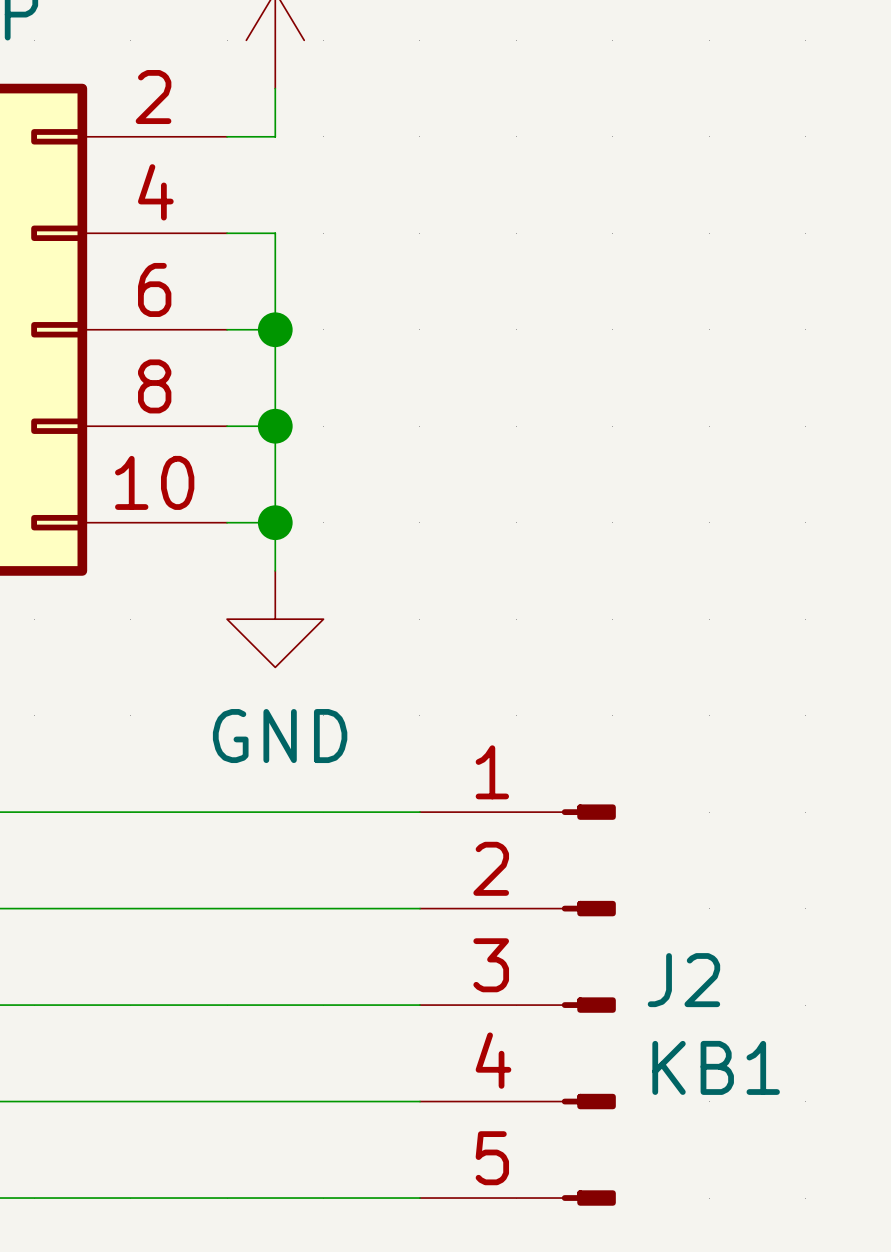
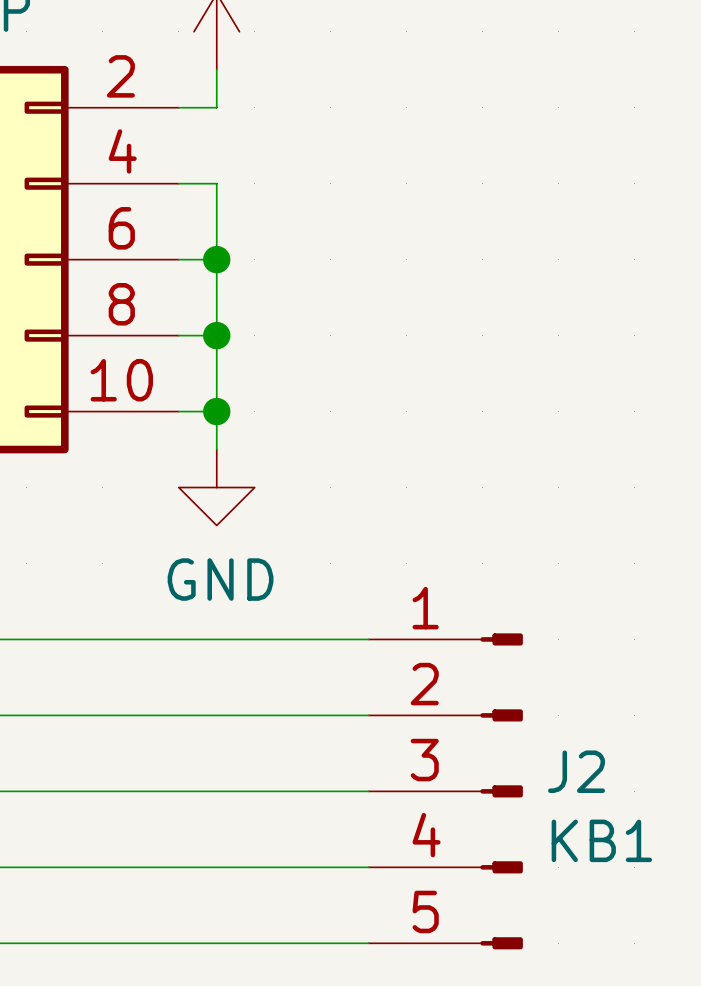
J2 position: (517, 1005) -> (445, 791)

